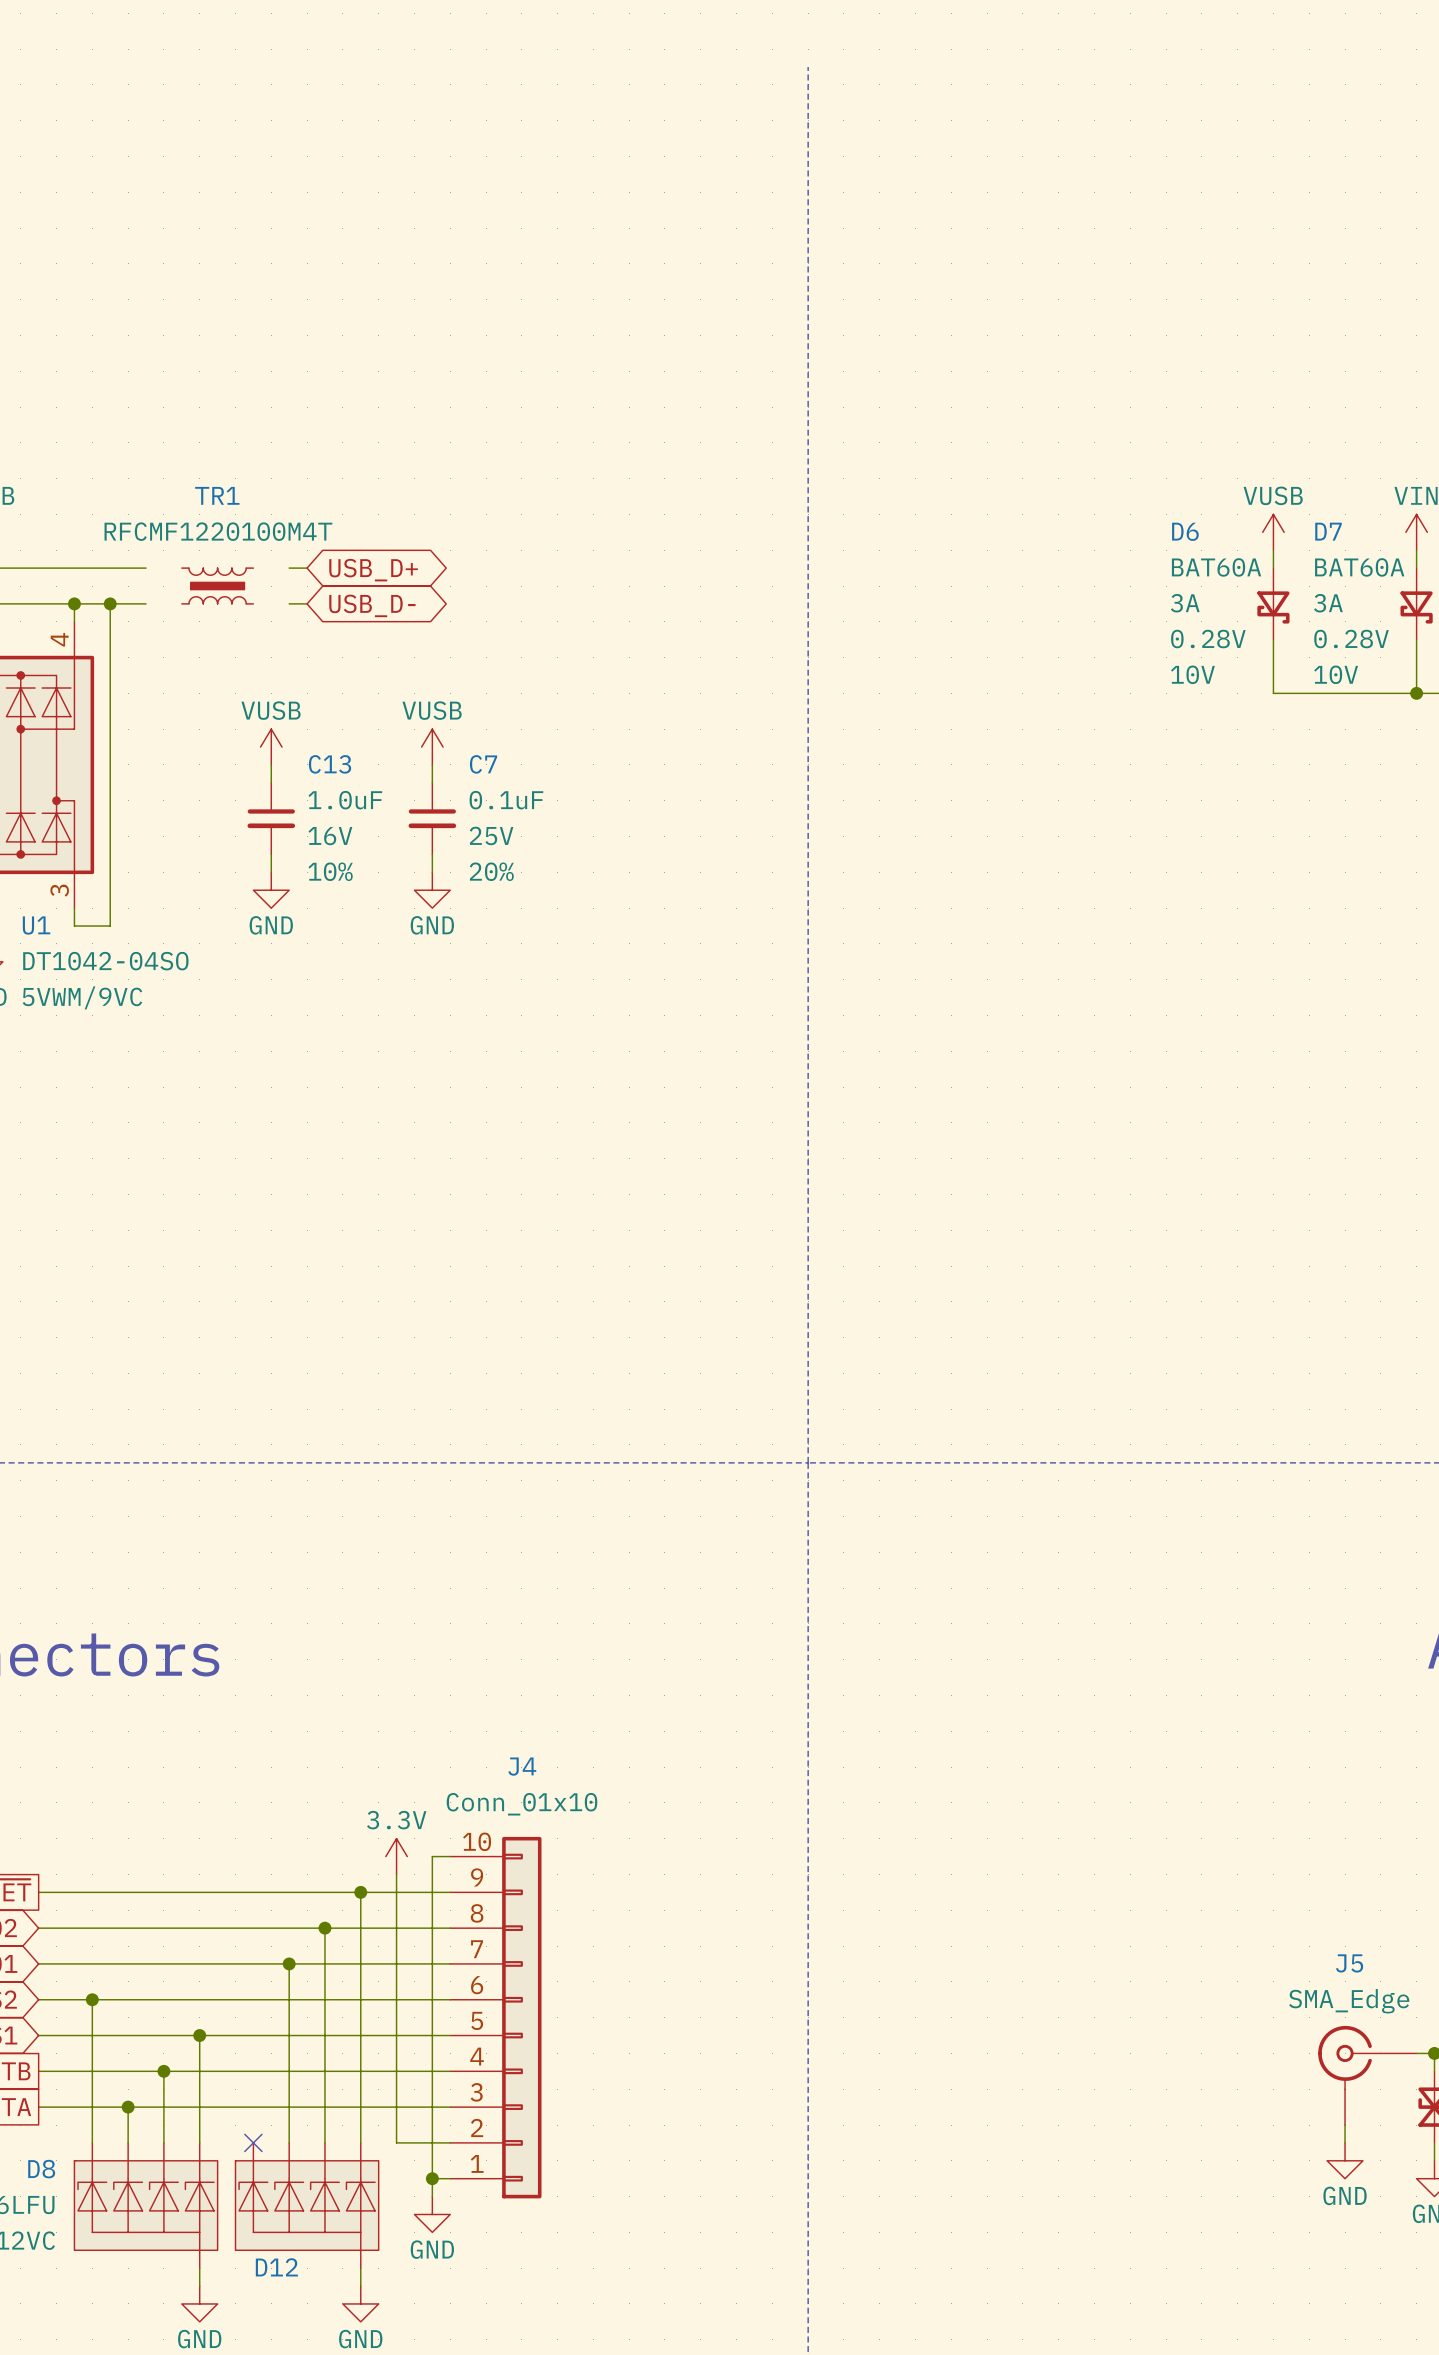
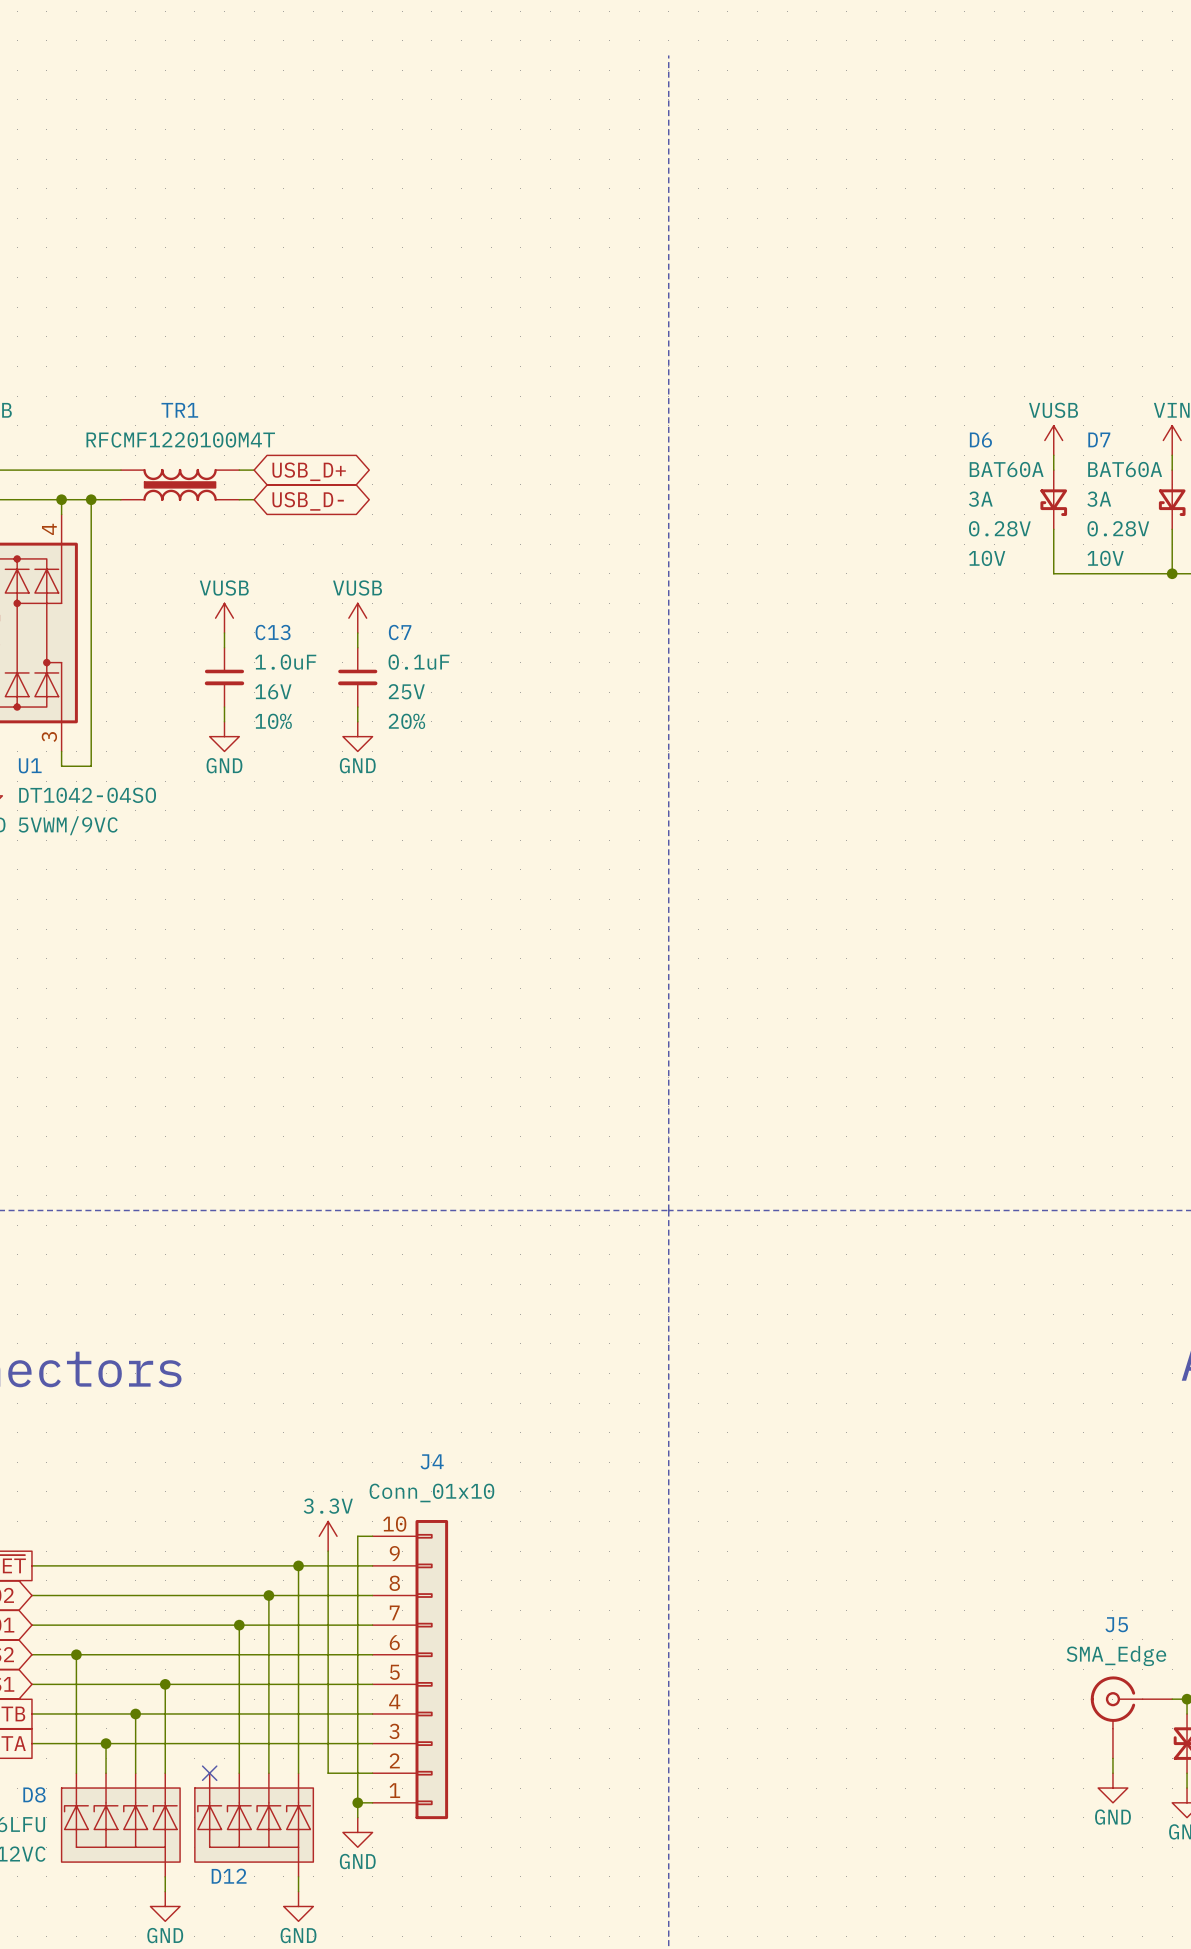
TR1 symbol: [181, 568, 254, 604] -> [120, 468, 240, 501]

